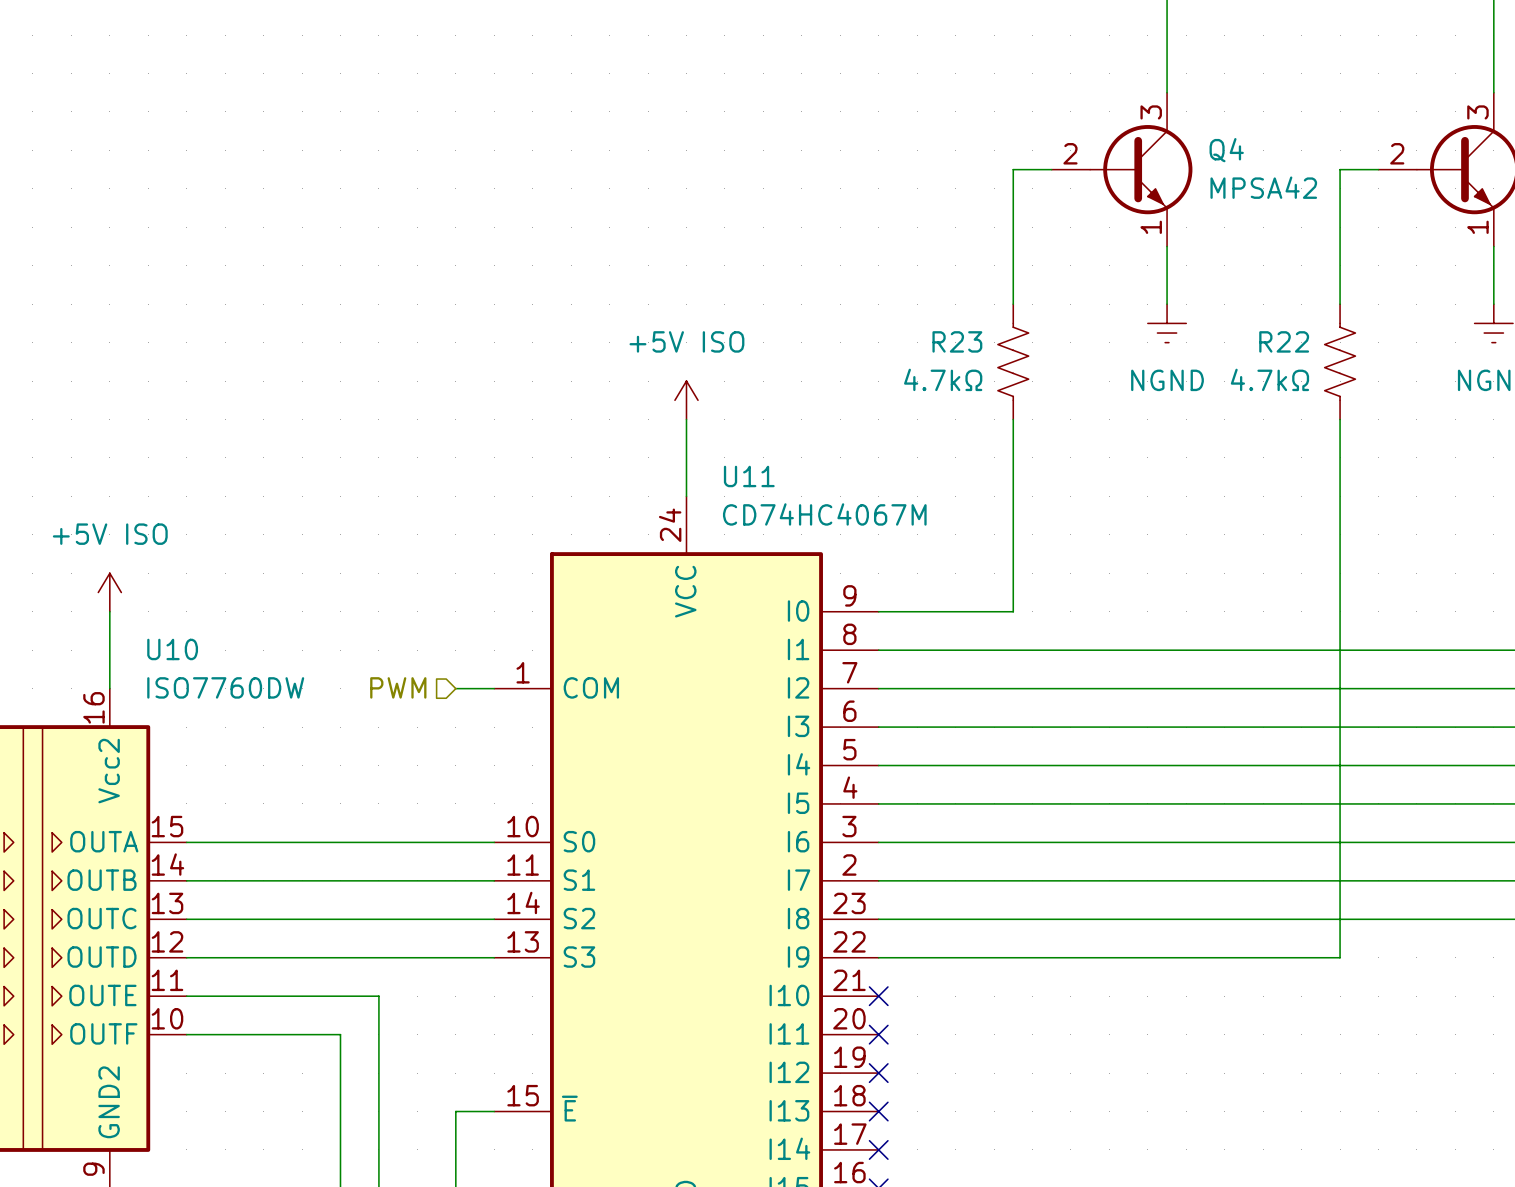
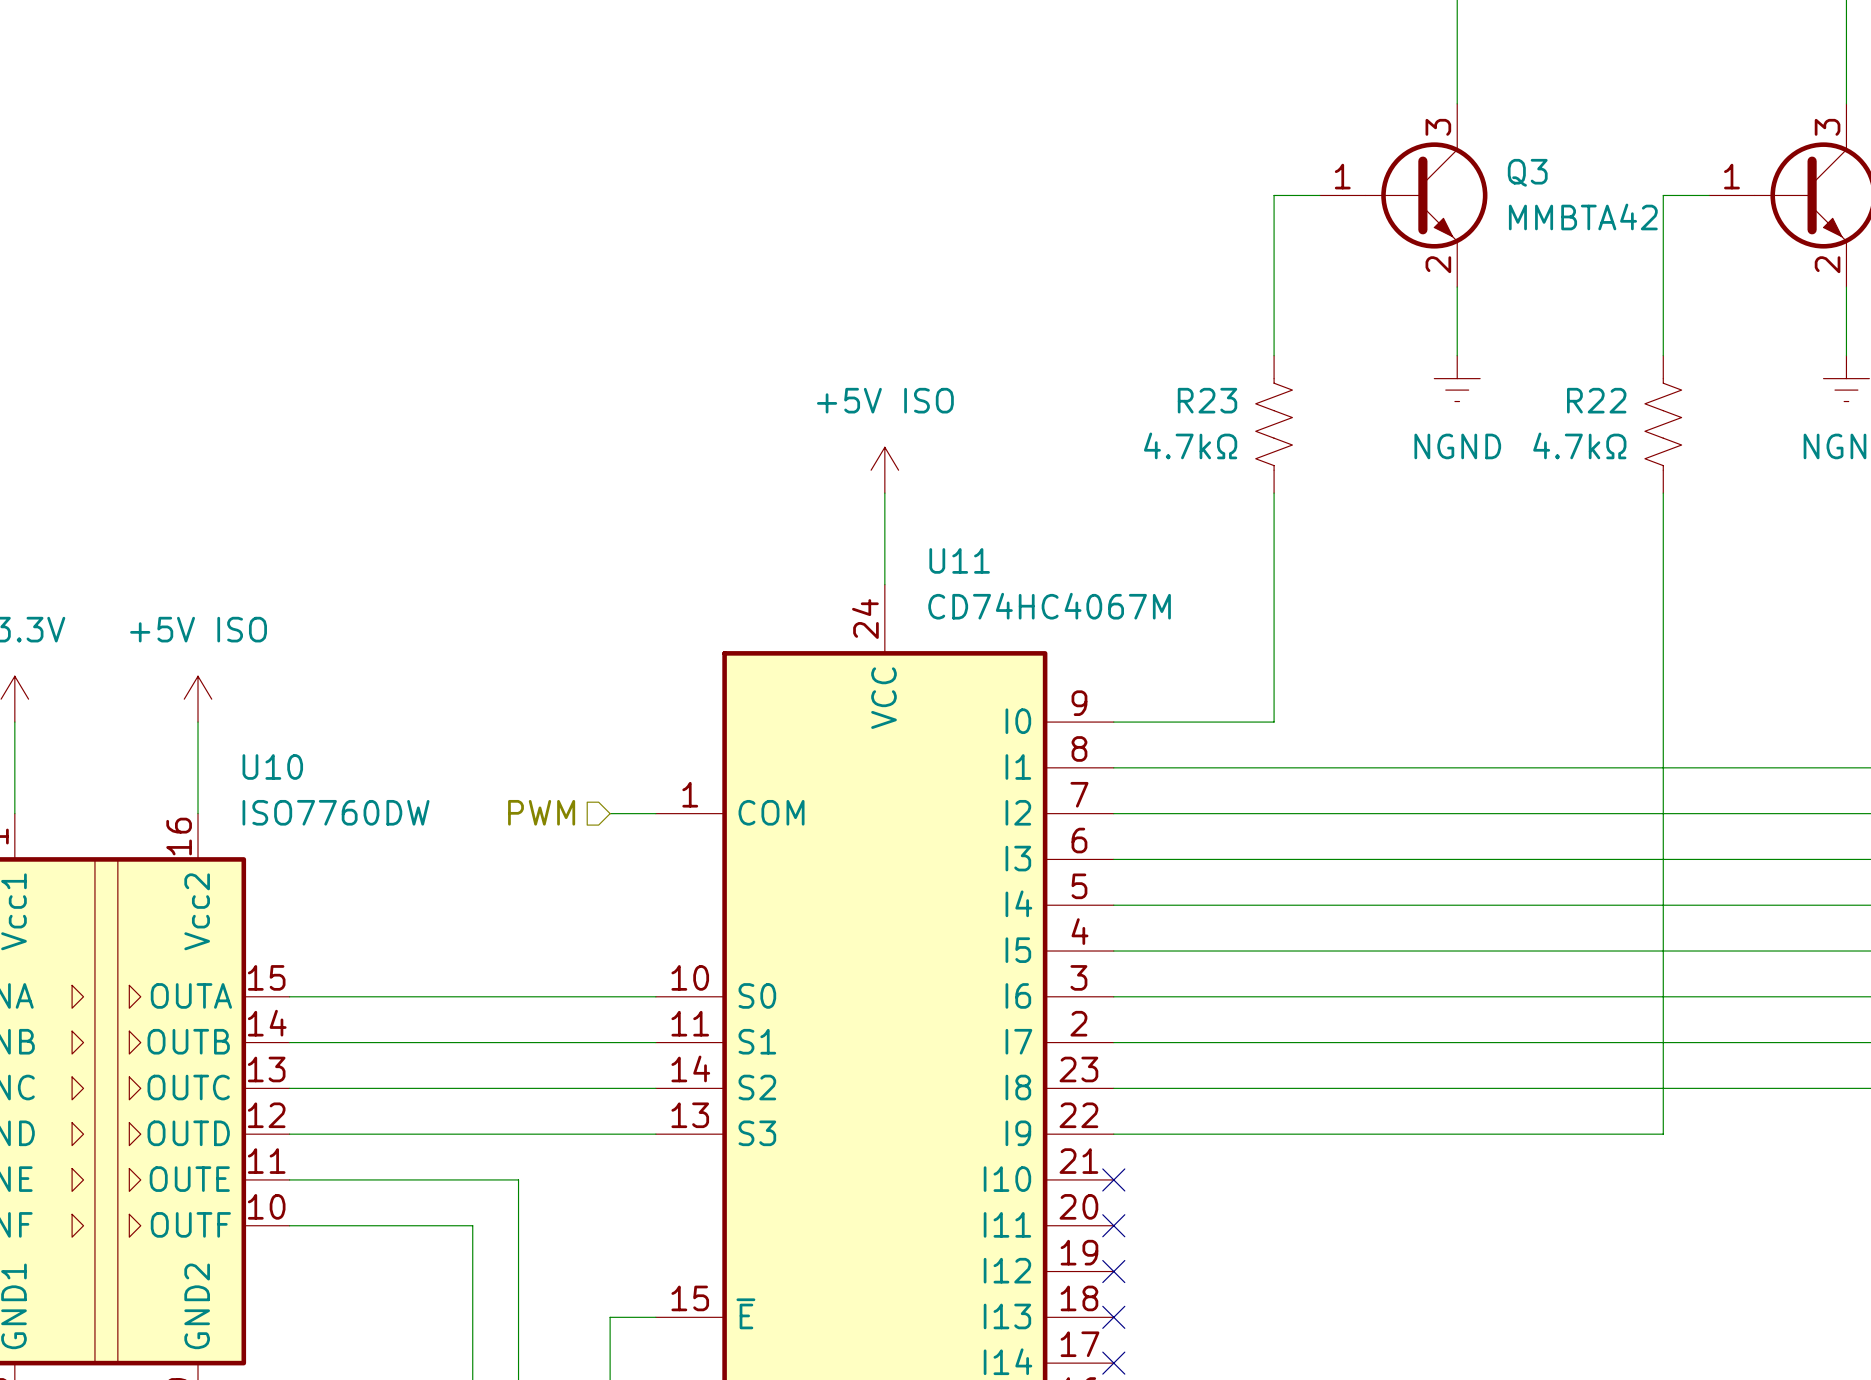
Q4 name: Q4 (1226, 150) -> Q3 (1527, 172)
Q4 pin number: 2 (1070, 153) -> 1 (1342, 176)
part pin number: 2 (1397, 153) -> 1 (1731, 176)
Q4 value: MPSA42 (1263, 187) -> MMBTA42 (1583, 216)
Q4 pin number: 1 (1151, 227) -> 2 (1438, 264)
part pin number: 1 (1477, 227) -> 2 (1827, 264)

